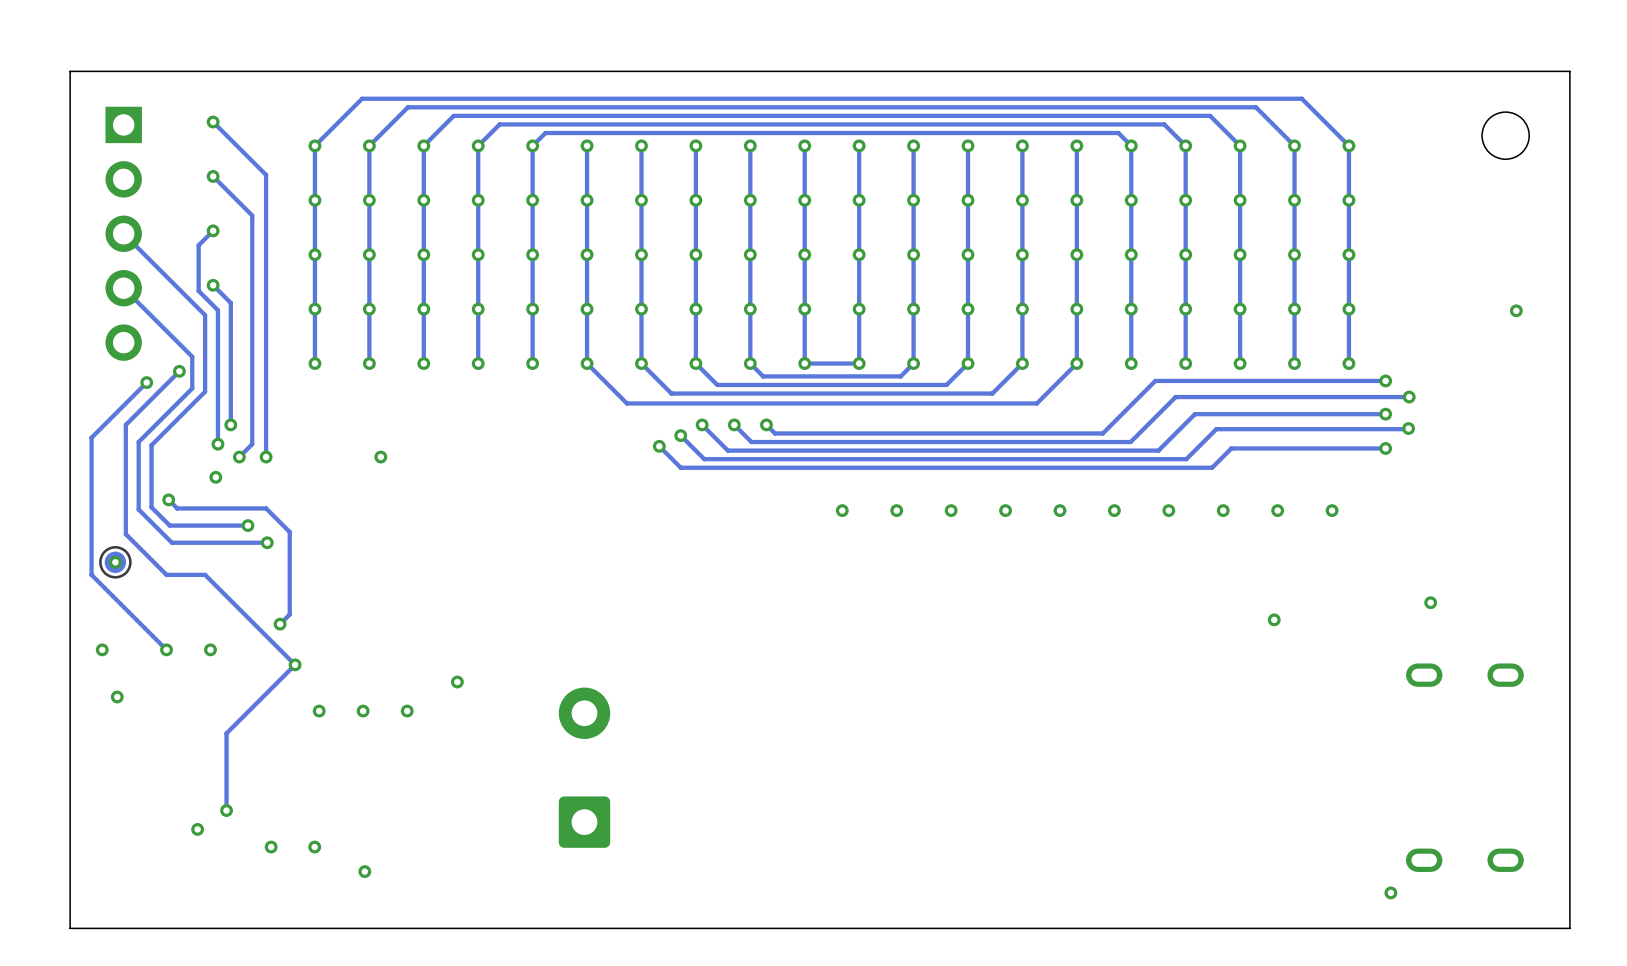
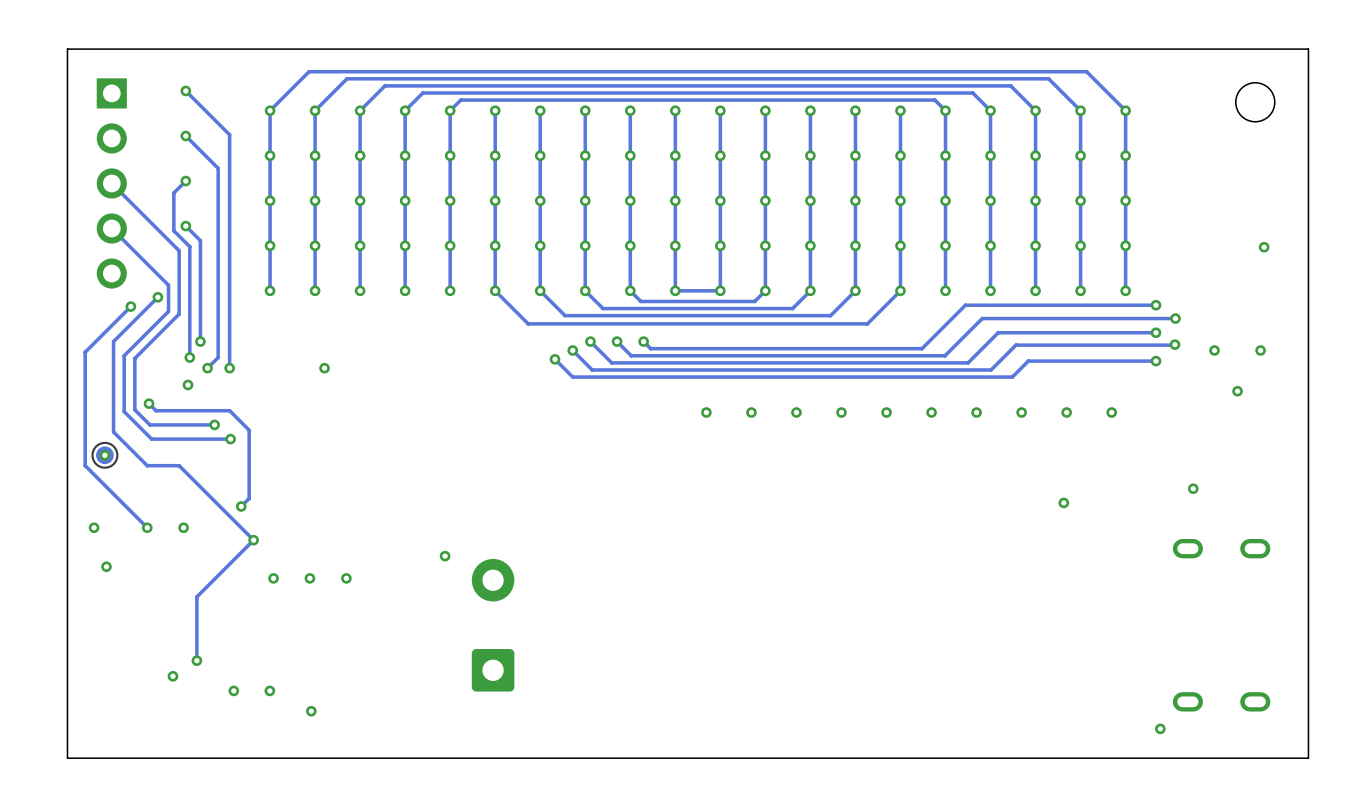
via: none -> (1214, 350)
via: none -> (1260, 350)
via: none -> (1237, 391)
via position: (457, 682) -> (445, 556)

